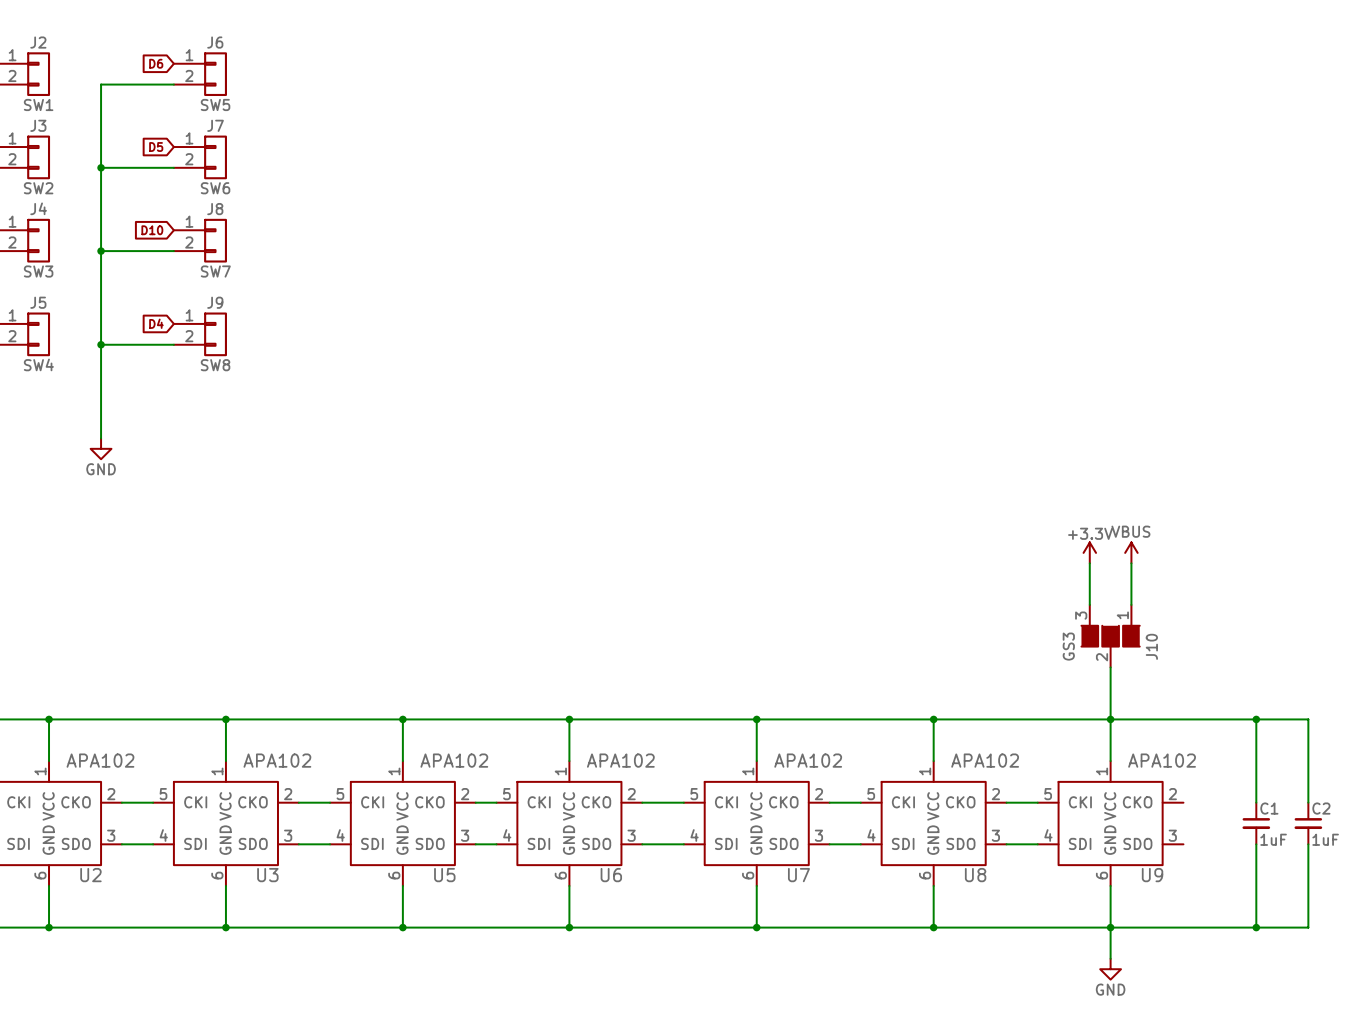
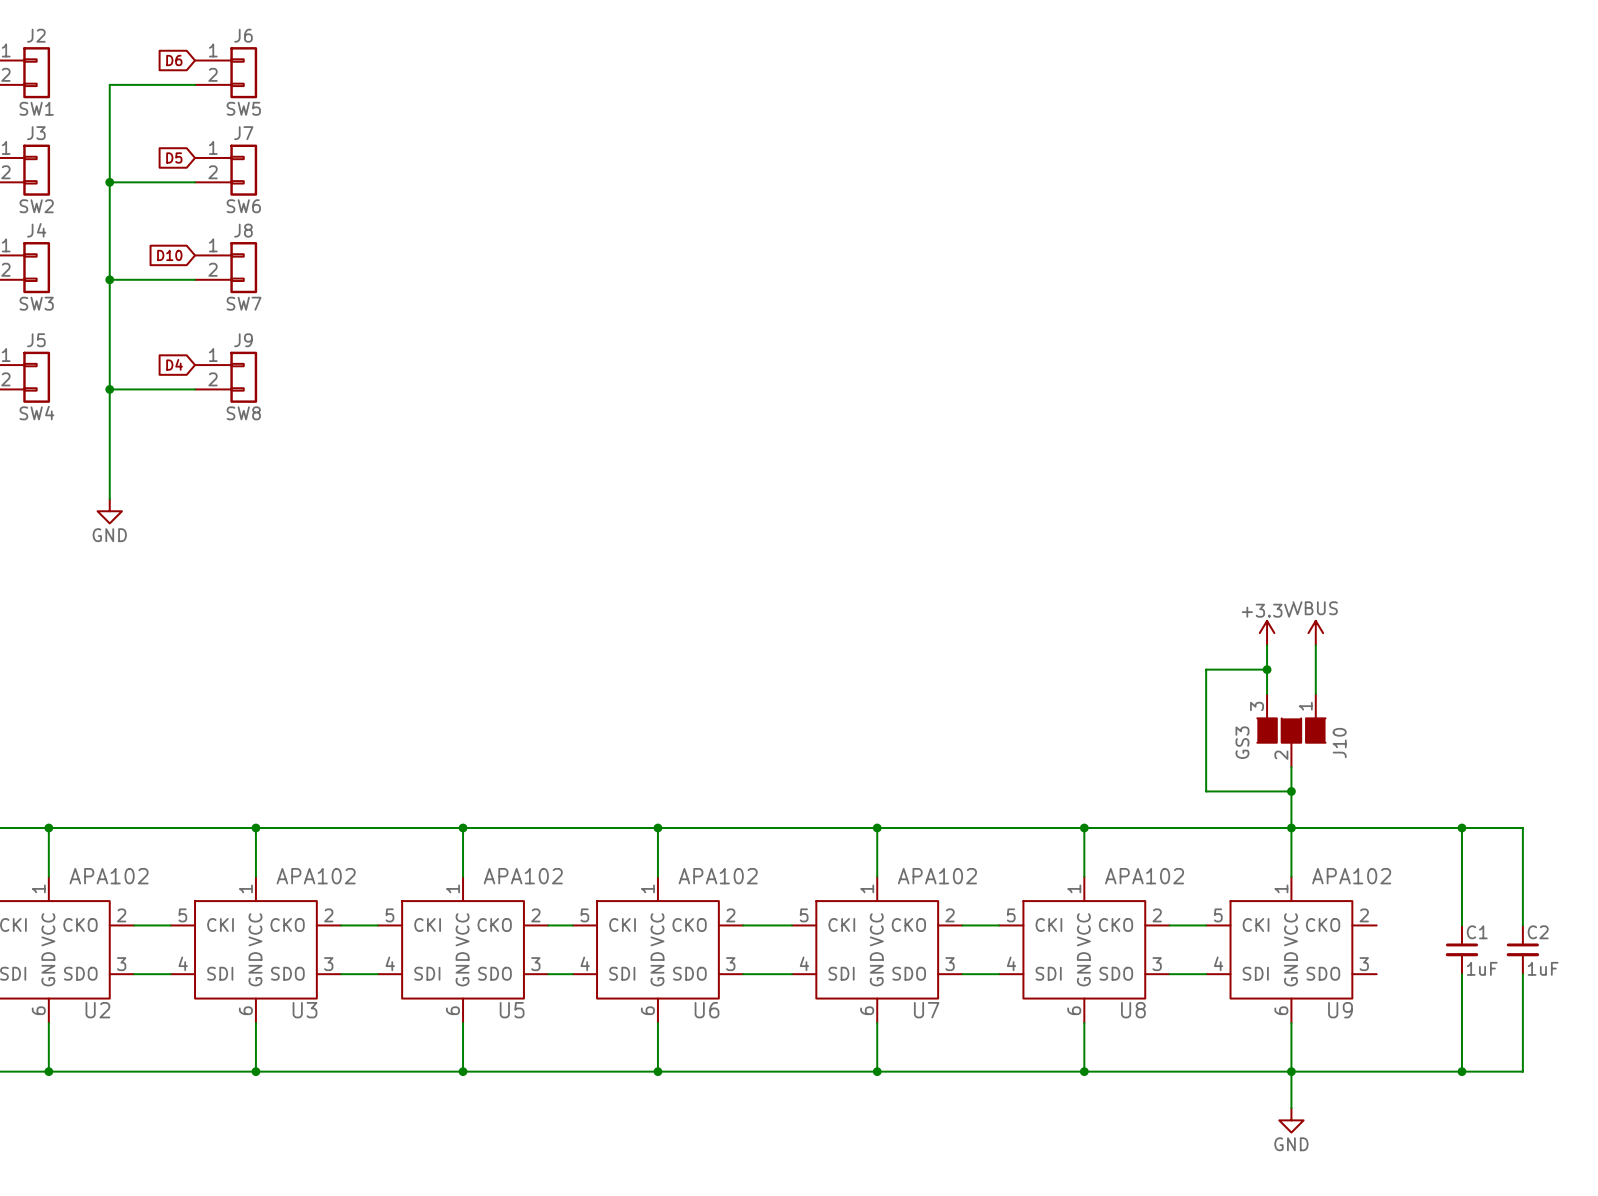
wire: none -> (1267, 669) (1206, 669) (1206, 791) (1291, 791)
junction: none -> (1267, 669)
junction: none -> (1291, 791)

